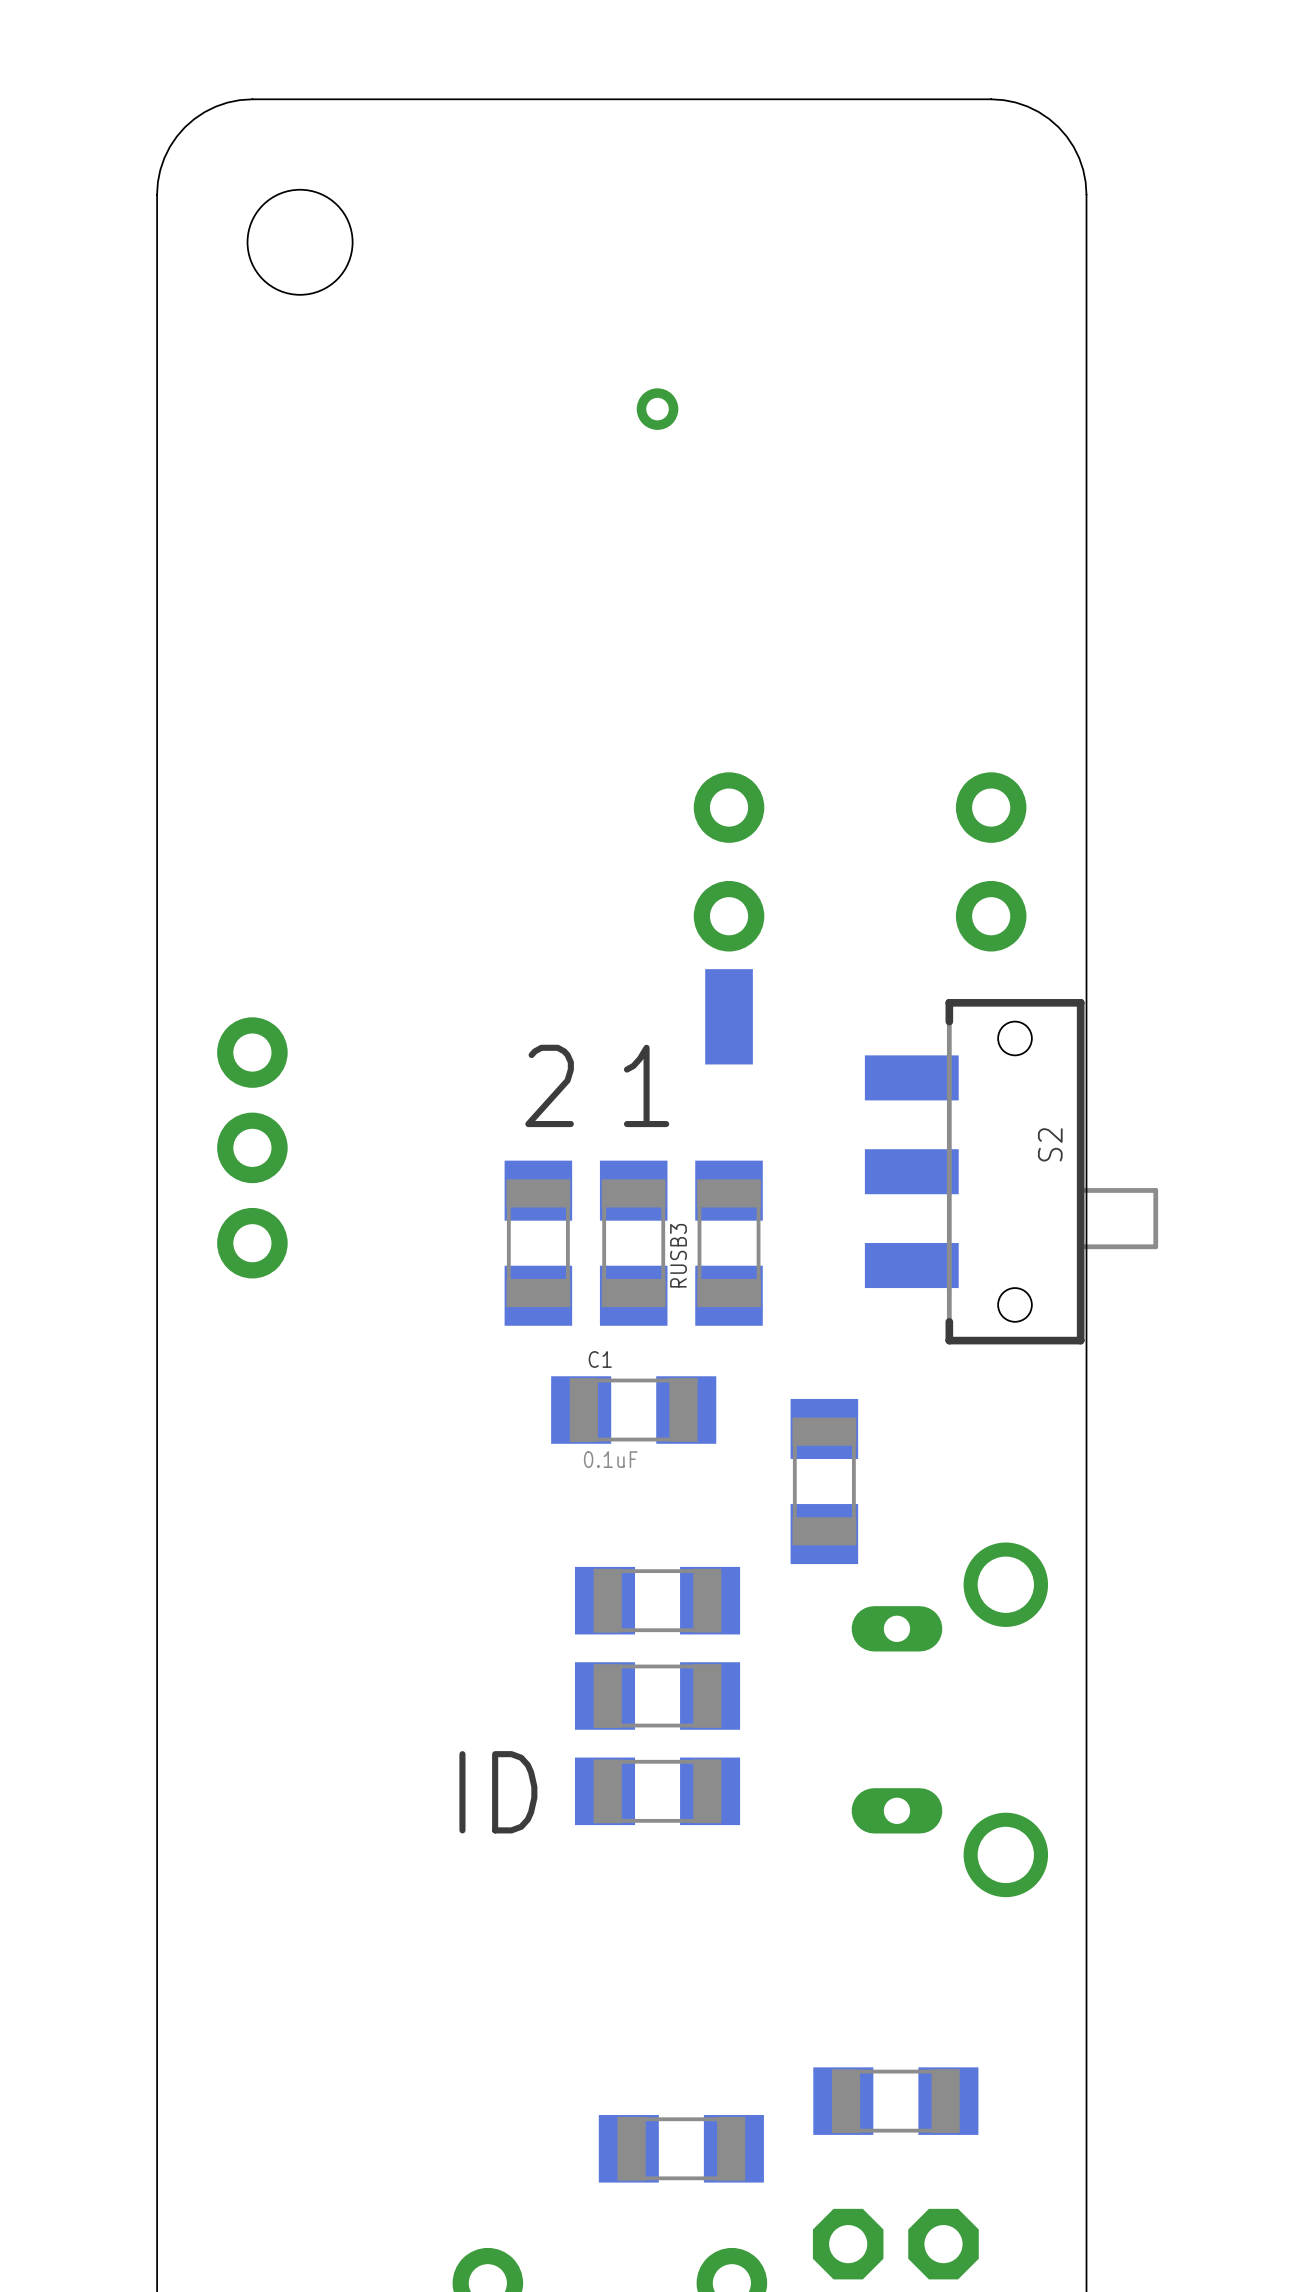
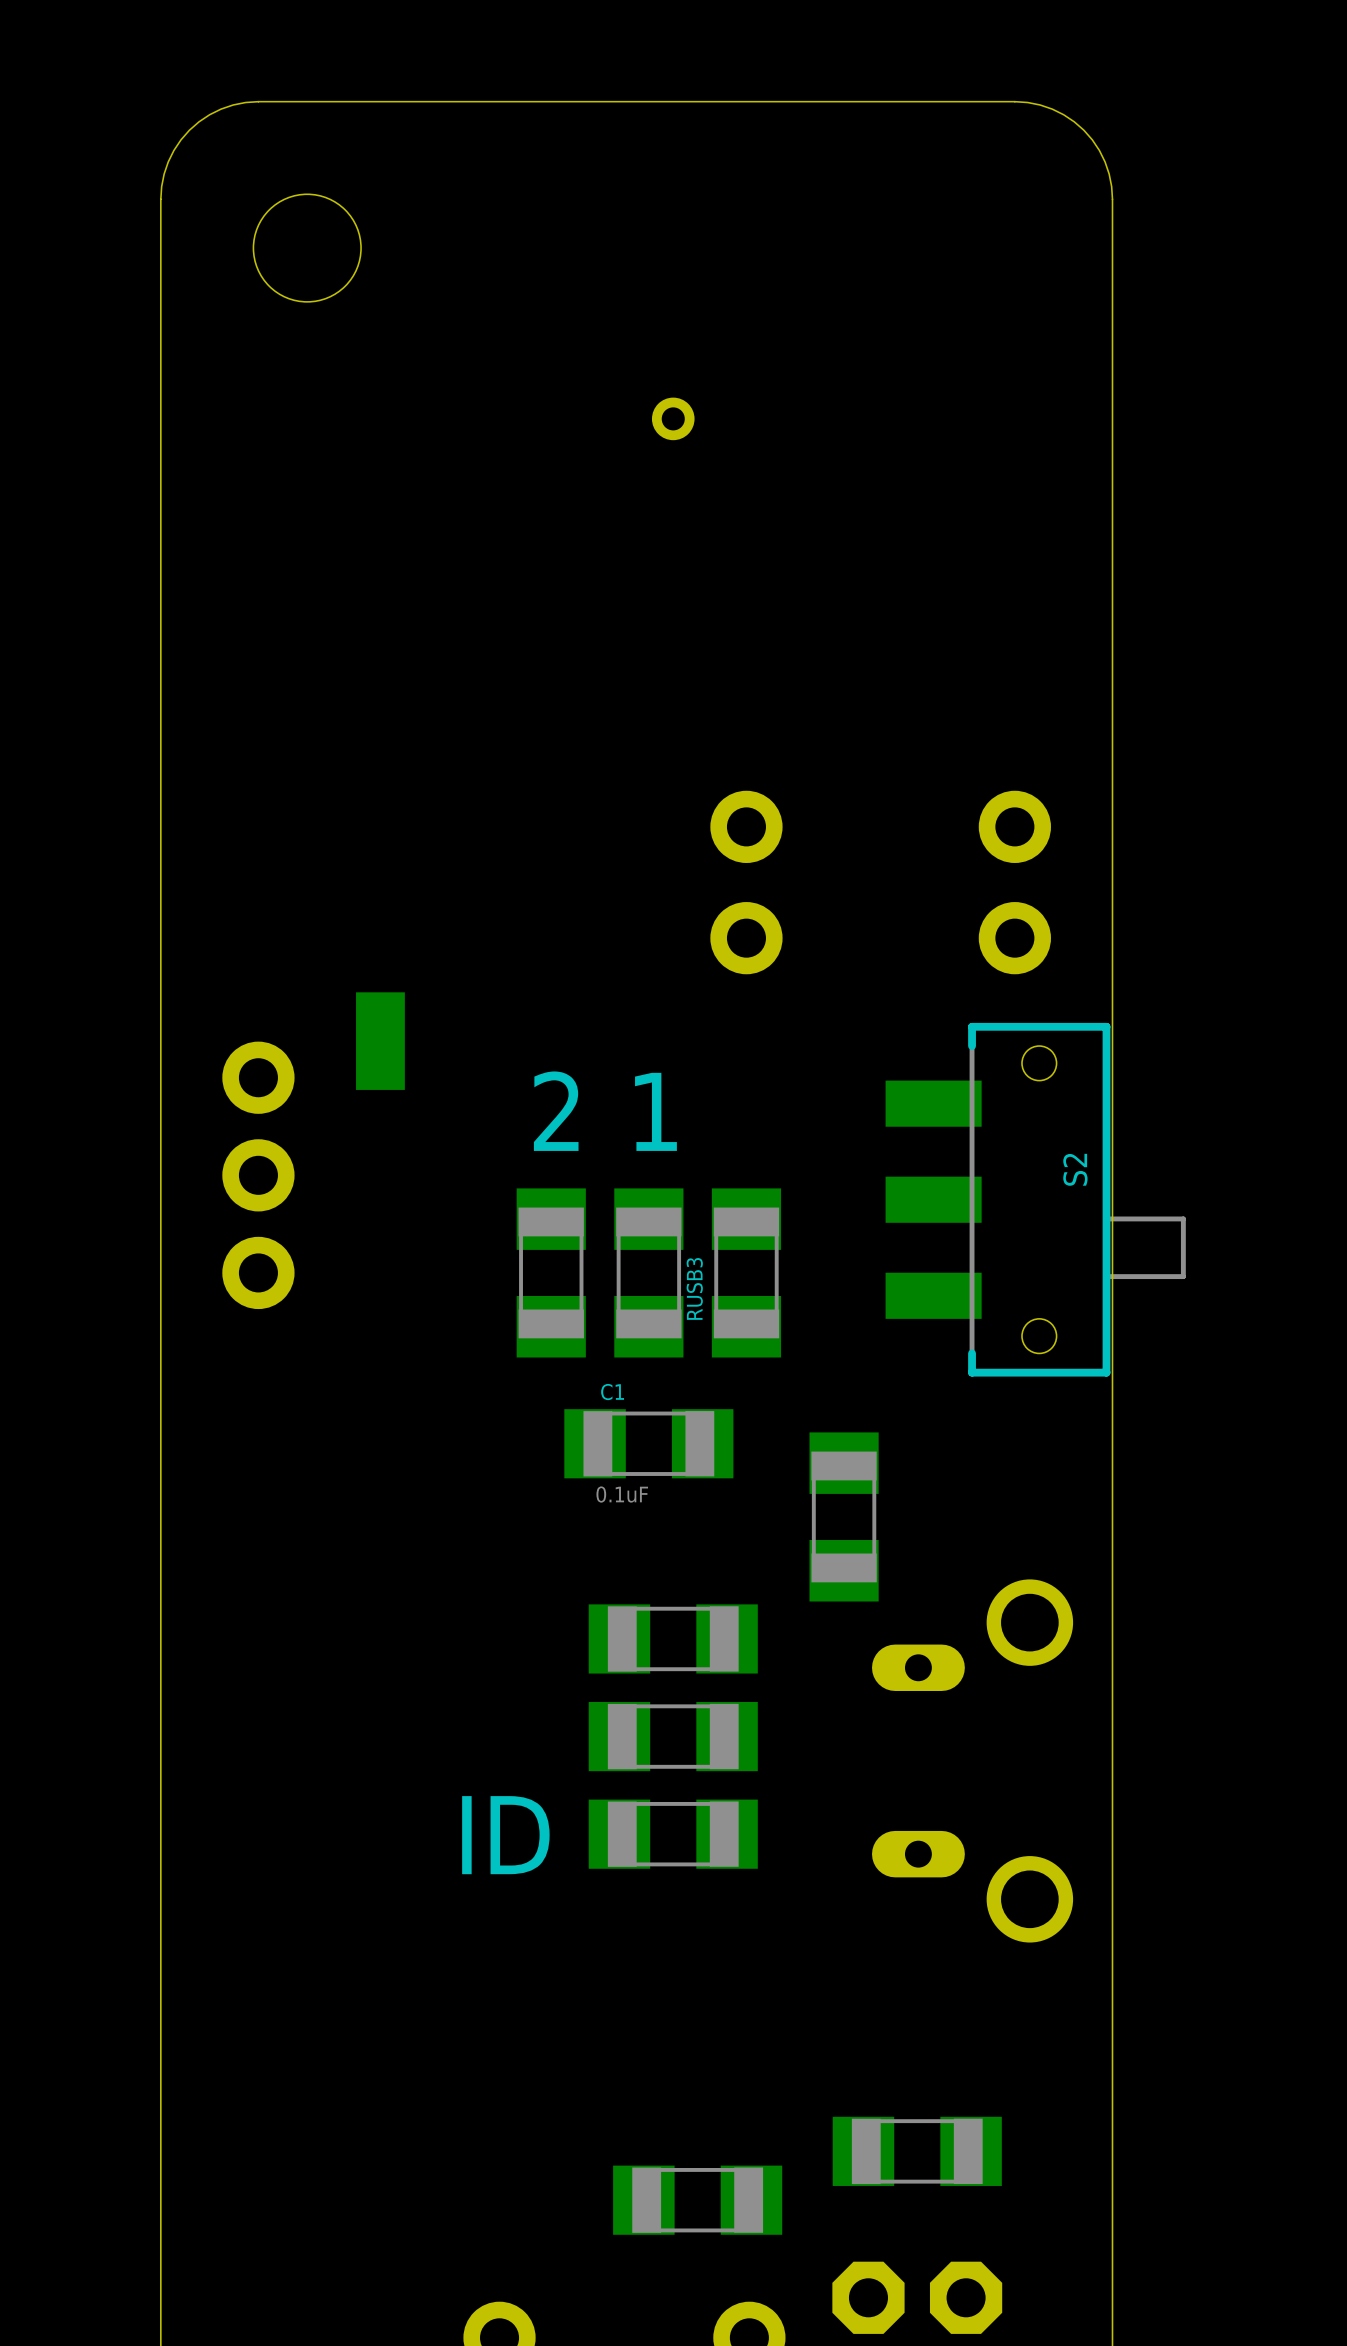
part position: (729, 1016) -> (380, 1041)

